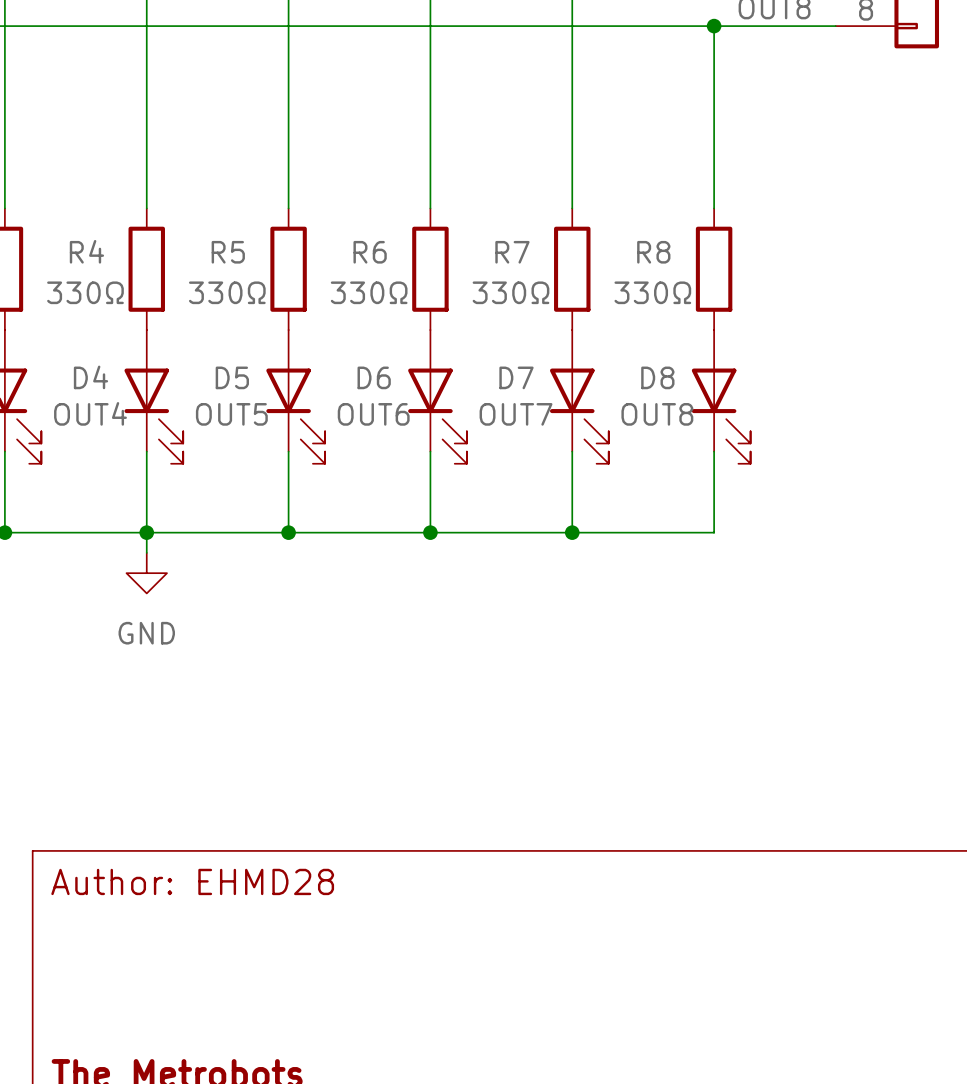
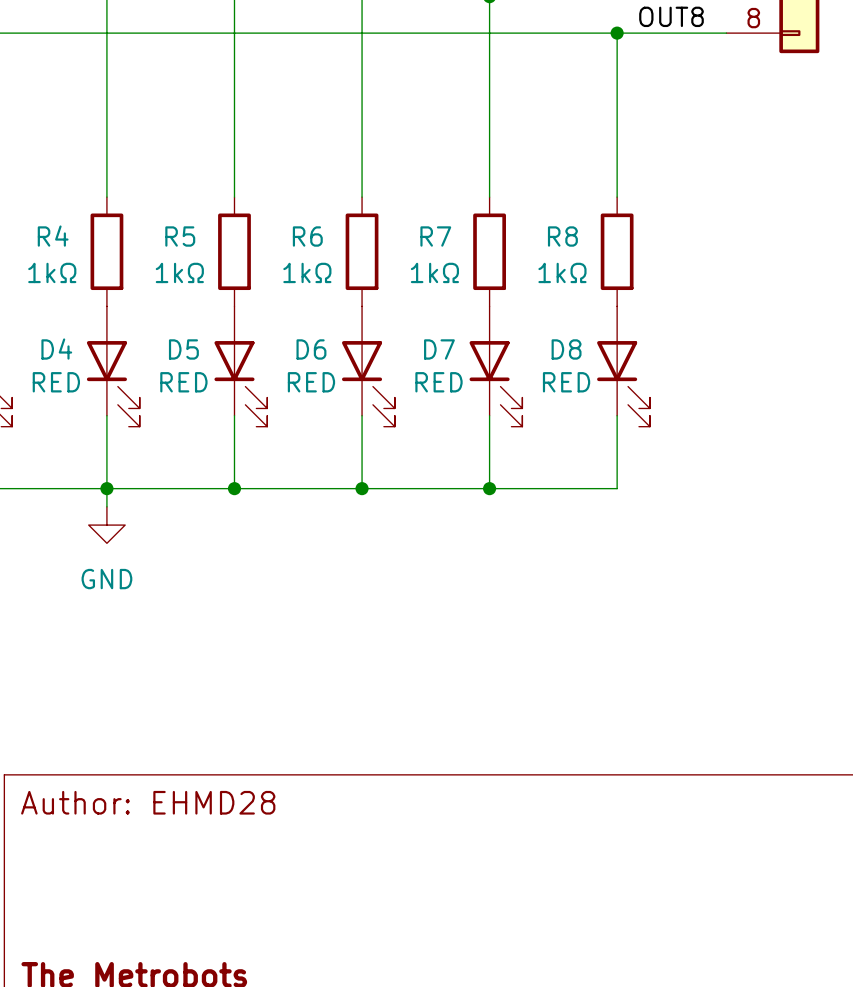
R4 value: 330Ω (85, 292) -> 1kΩ (52, 272)
R5 value: 330Ω (227, 292) -> 1kΩ (179, 272)
R6 value: 330Ω (369, 292) -> 1kΩ (307, 272)
R7 value: 330Ω (510, 292) -> 1kΩ (434, 272)
R8 value: 330Ω (652, 292) -> 1kΩ (562, 272)
D4 value: OUT4 (90, 413) -> RED (56, 382)
D5 value: OUT5 (231, 414) -> RED (183, 382)
D6 value: OUT6 (373, 414) -> RED (311, 382)
D7 value: OUT7 (516, 414) -> RED (438, 382)
D8 value: OUT8 (657, 414) -> RED (566, 382)

